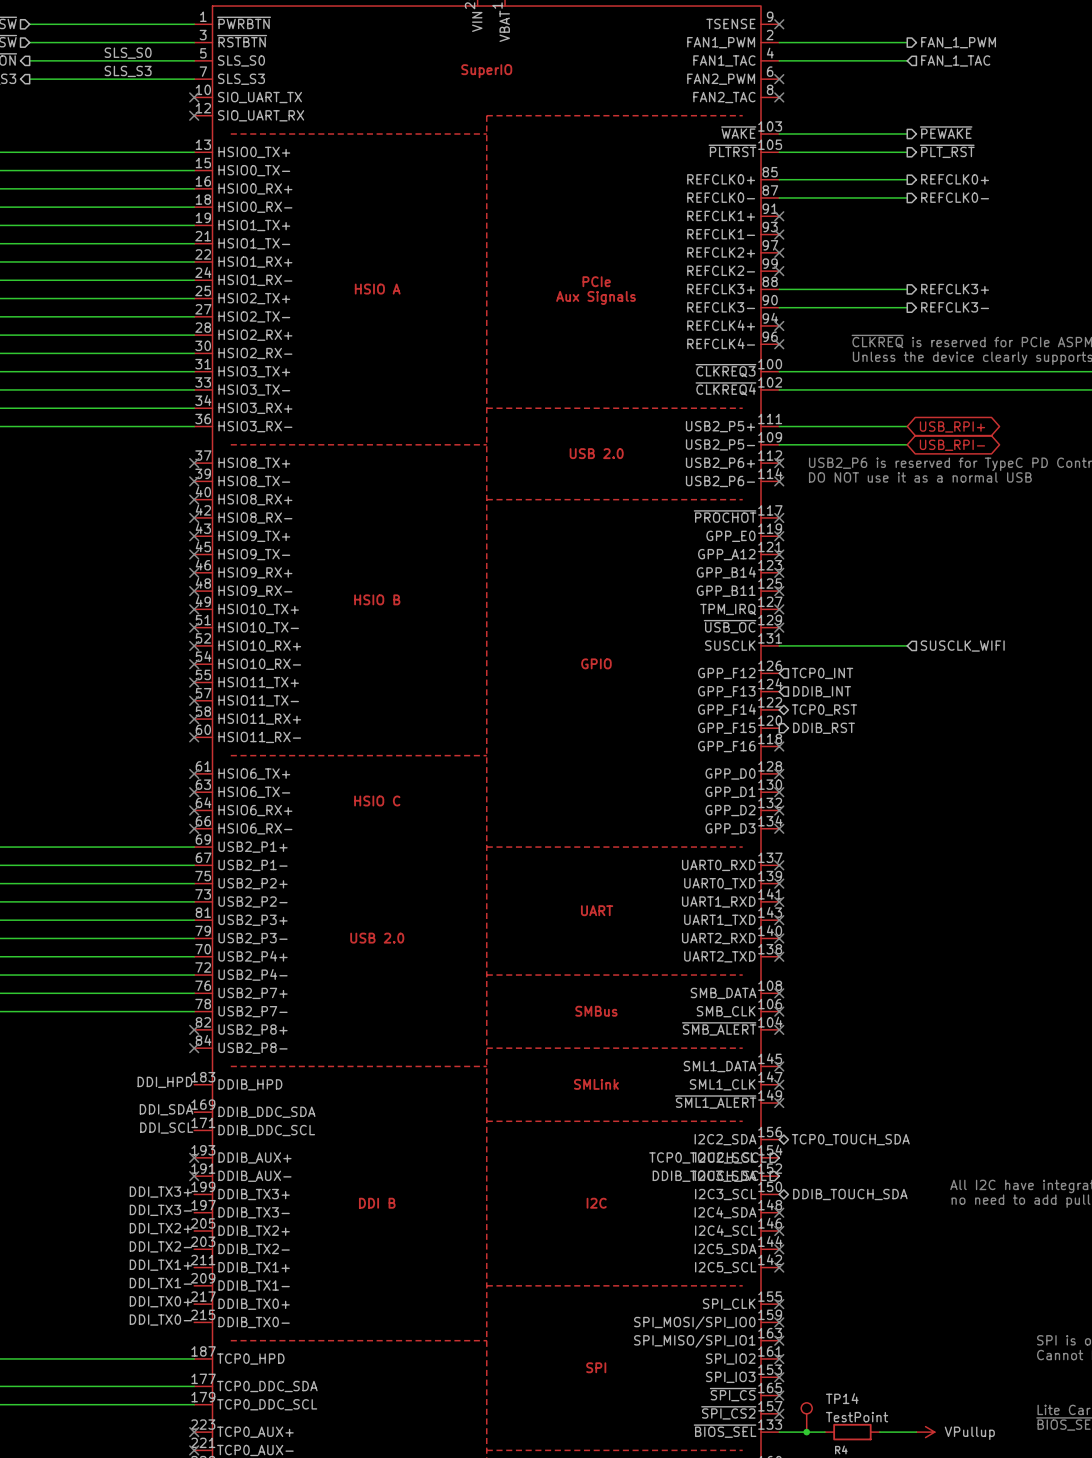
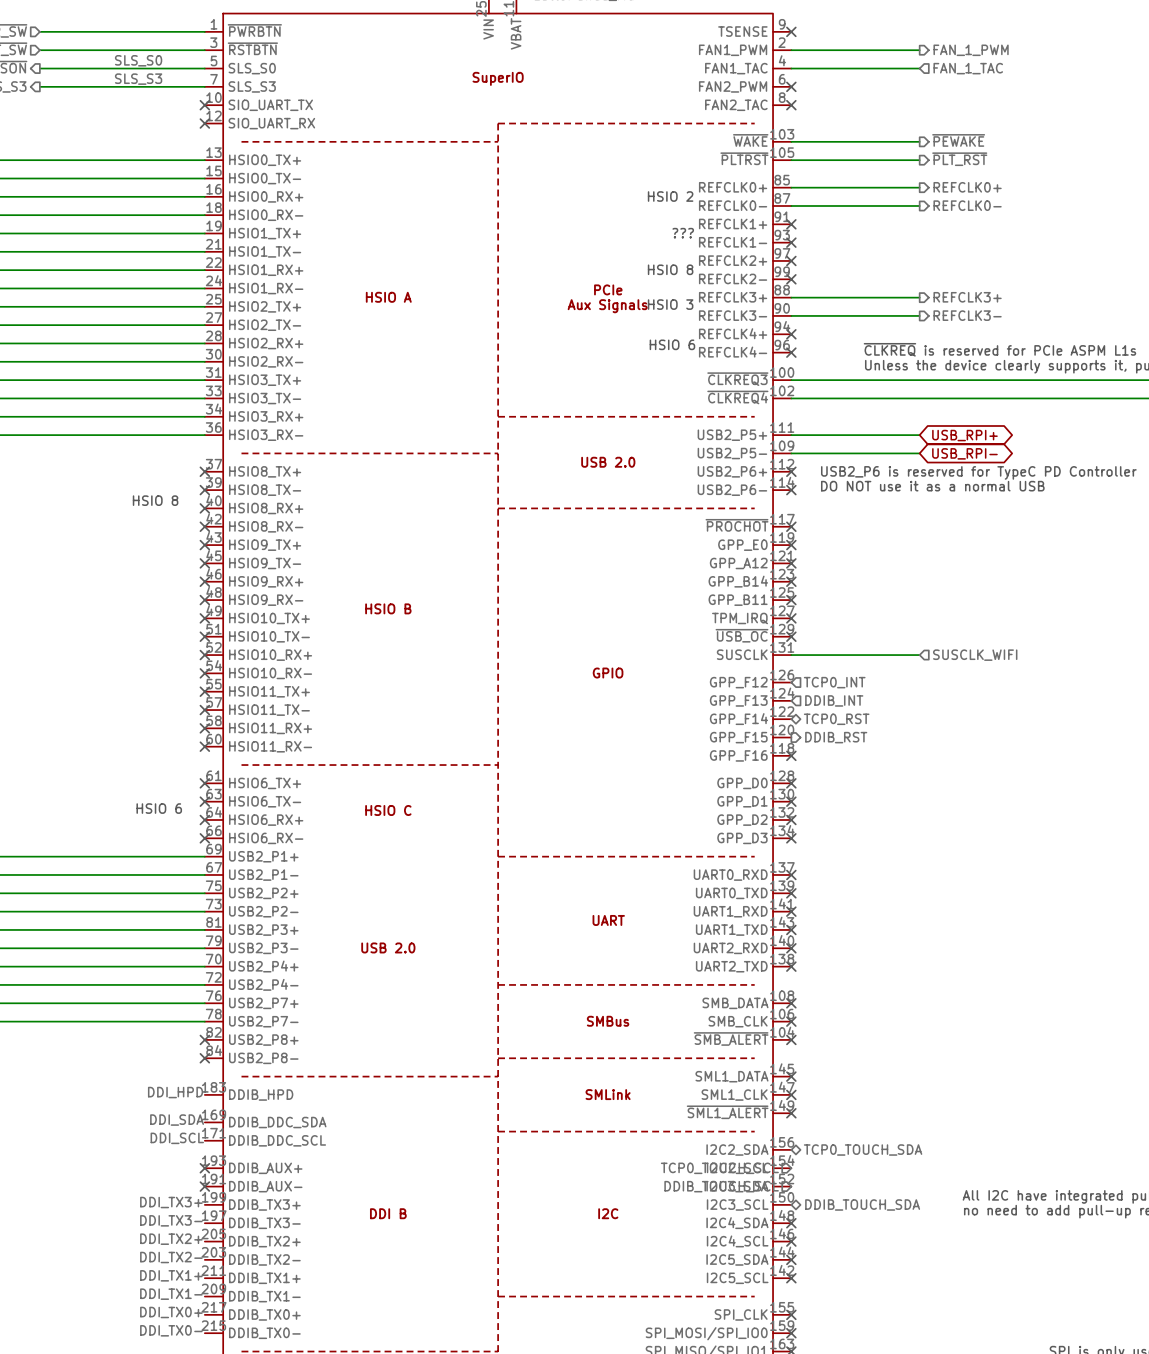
text: none -> HSIO 2 (670, 196)
text: none -> ??? (683, 233)
text: none -> HSIO 8 (670, 269)
text: none -> HSIO 3 (670, 304)
text: none -> HSIO 6 (672, 344)
text: none -> HSIO 8 (155, 500)
text: none -> HSIO 6 (159, 808)

